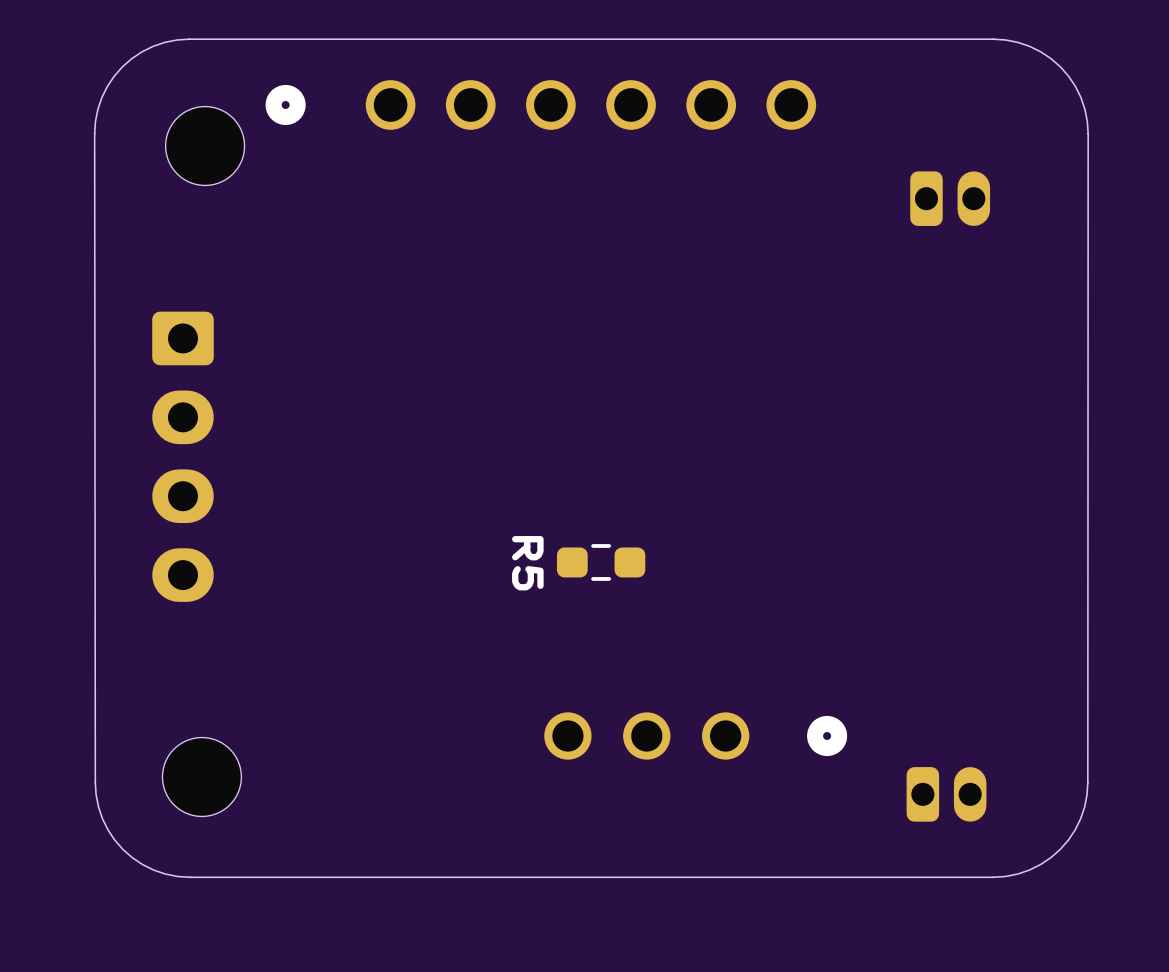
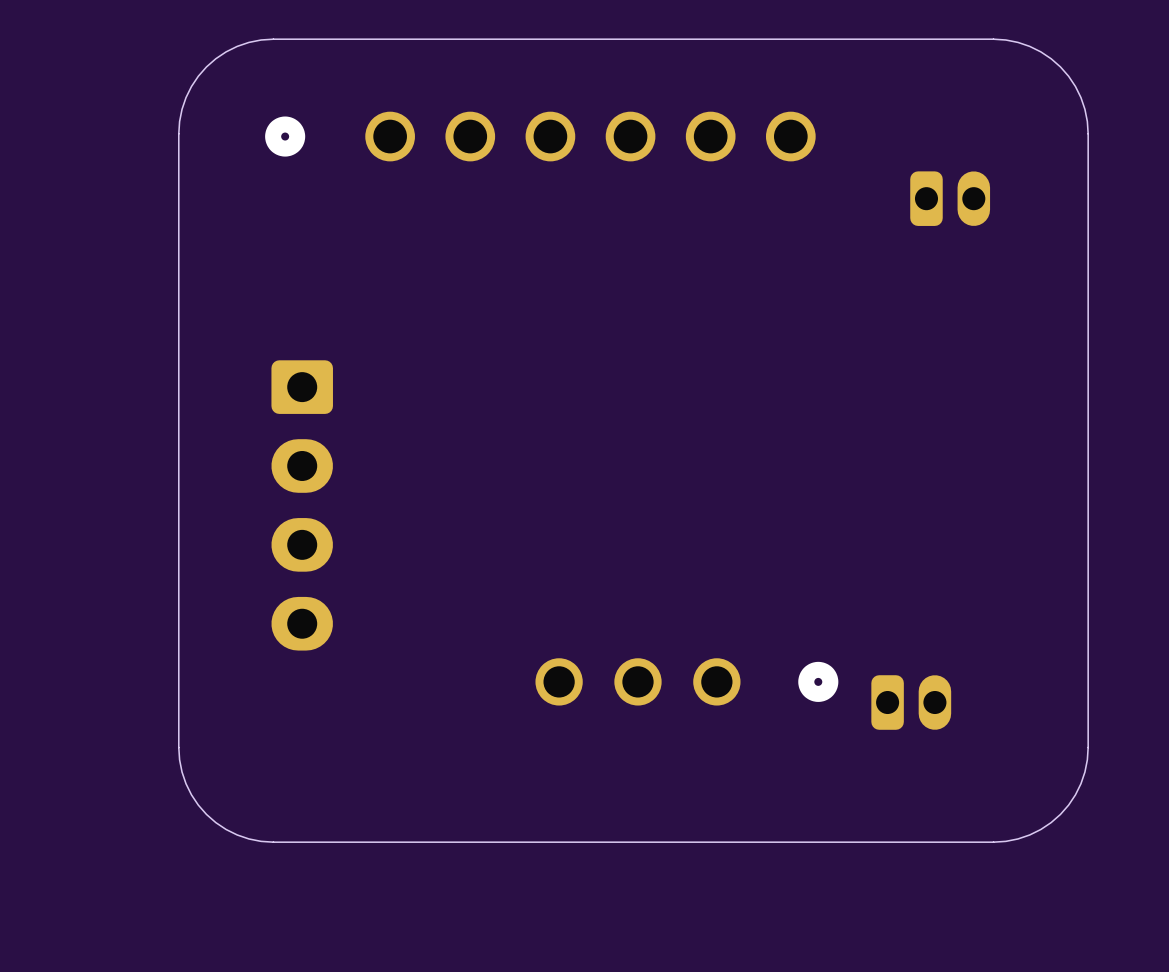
board edge: (273, 39) (189, 39) (176, 40) (153, 46) (131, 58) (114, 76) (101, 97) (95, 121) (96, 795) (102, 818) (108, 829) (123, 849) (132, 857) (153, 870) (177, 876) (993, 877) (1017, 874) (1040, 864) (1050, 857) (1068, 840) (1080, 818) (1087, 795) (1087, 782) (1088, 133) -> (273, 39) (261, 40) (237, 46) (215, 58) (206, 66) (198, 76) (186, 97) (179, 121) (178, 133) (179, 759) (186, 783) (191, 794) (206, 814) (226, 829) (248, 838) (261, 841) (993, 842) (1005, 841) (1029, 834) (1051, 822) (1068, 805) (1080, 783) (1087, 759) (1088, 747) (1088, 133)
part position: (540, 104) -> (540, 136)
part: (205, 146) -> none
part position: (183, 456) -> (302, 505)
R5: (601, 562) -> none
part position: (695, 735) -> (686, 681)
part: (201, 777) -> none
part position: (946, 794) -> (911, 702)

